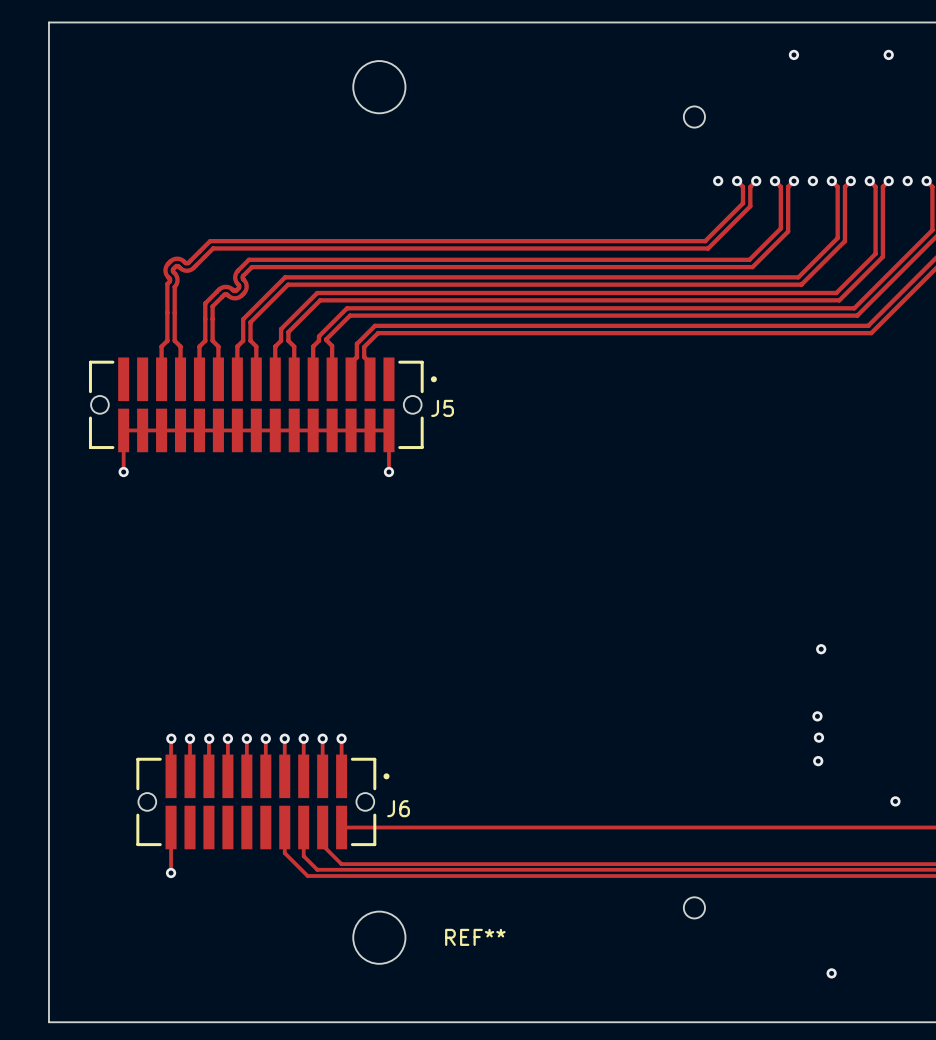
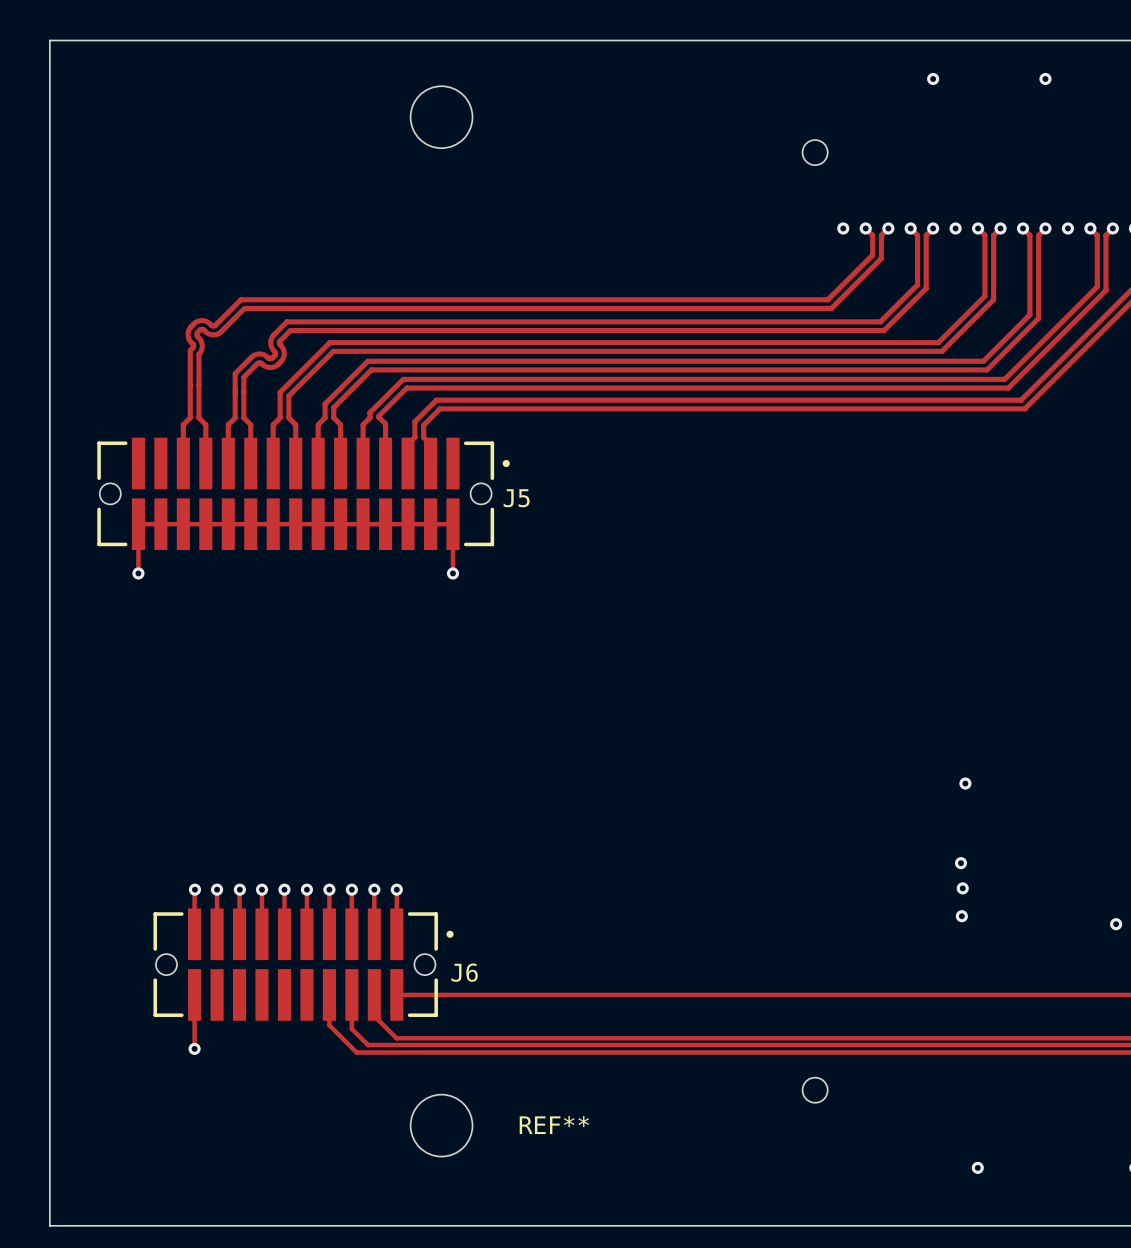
via: (895, 801) -> none

